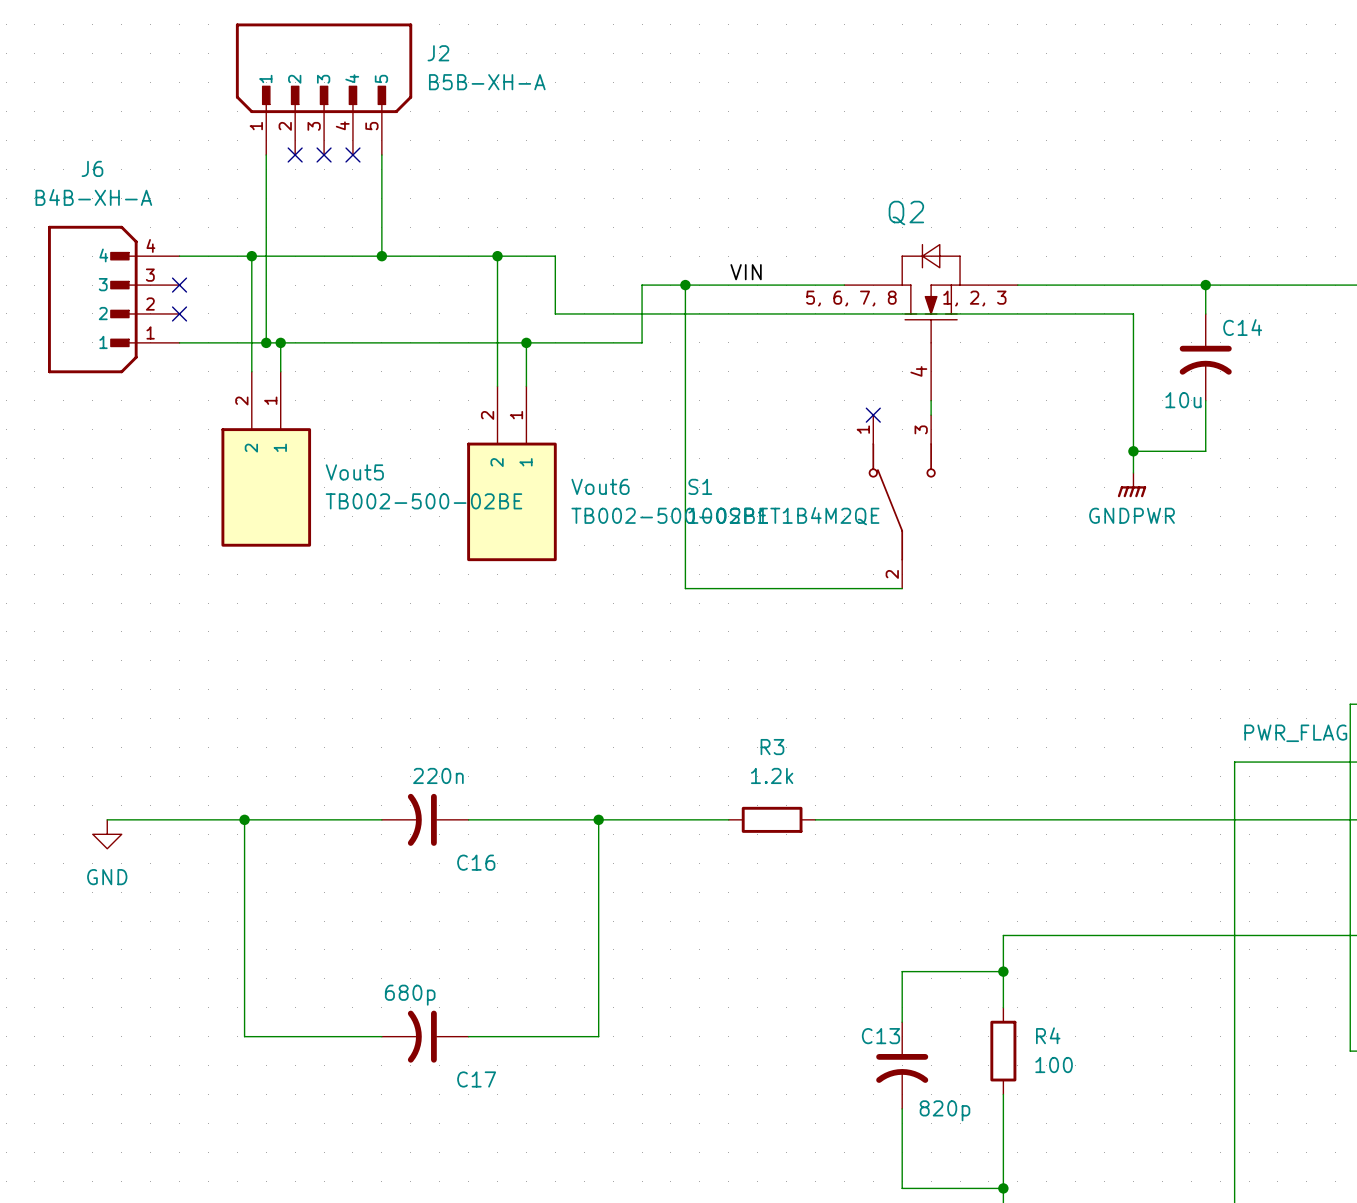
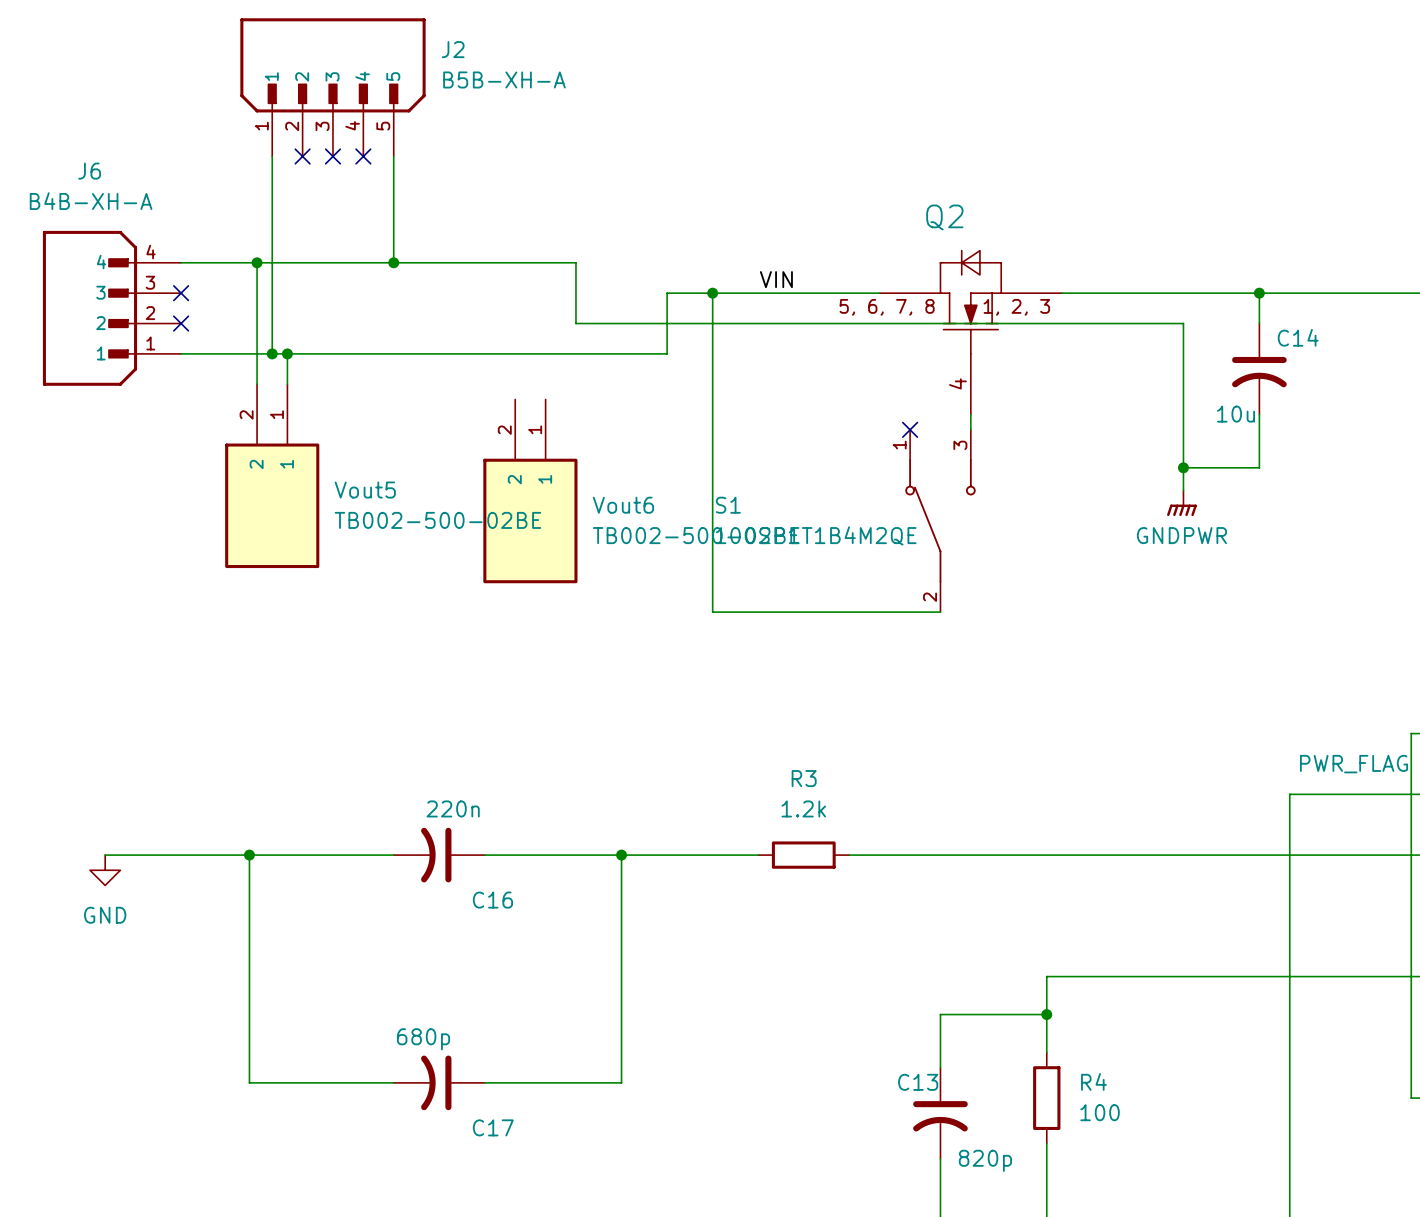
wire: (497, 256) (497, 386) -> none
junction: (497, 256) -> none
wire: (526, 342) (526, 386) -> none
junction: (526, 342) -> none

